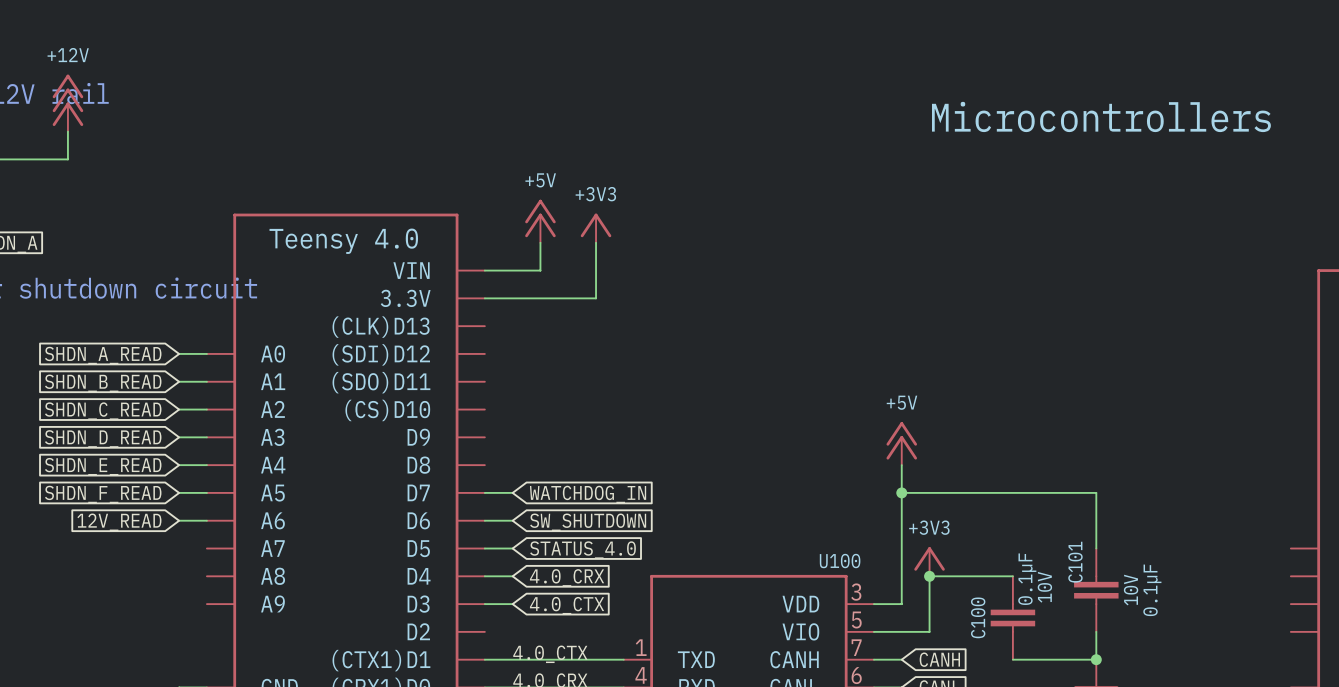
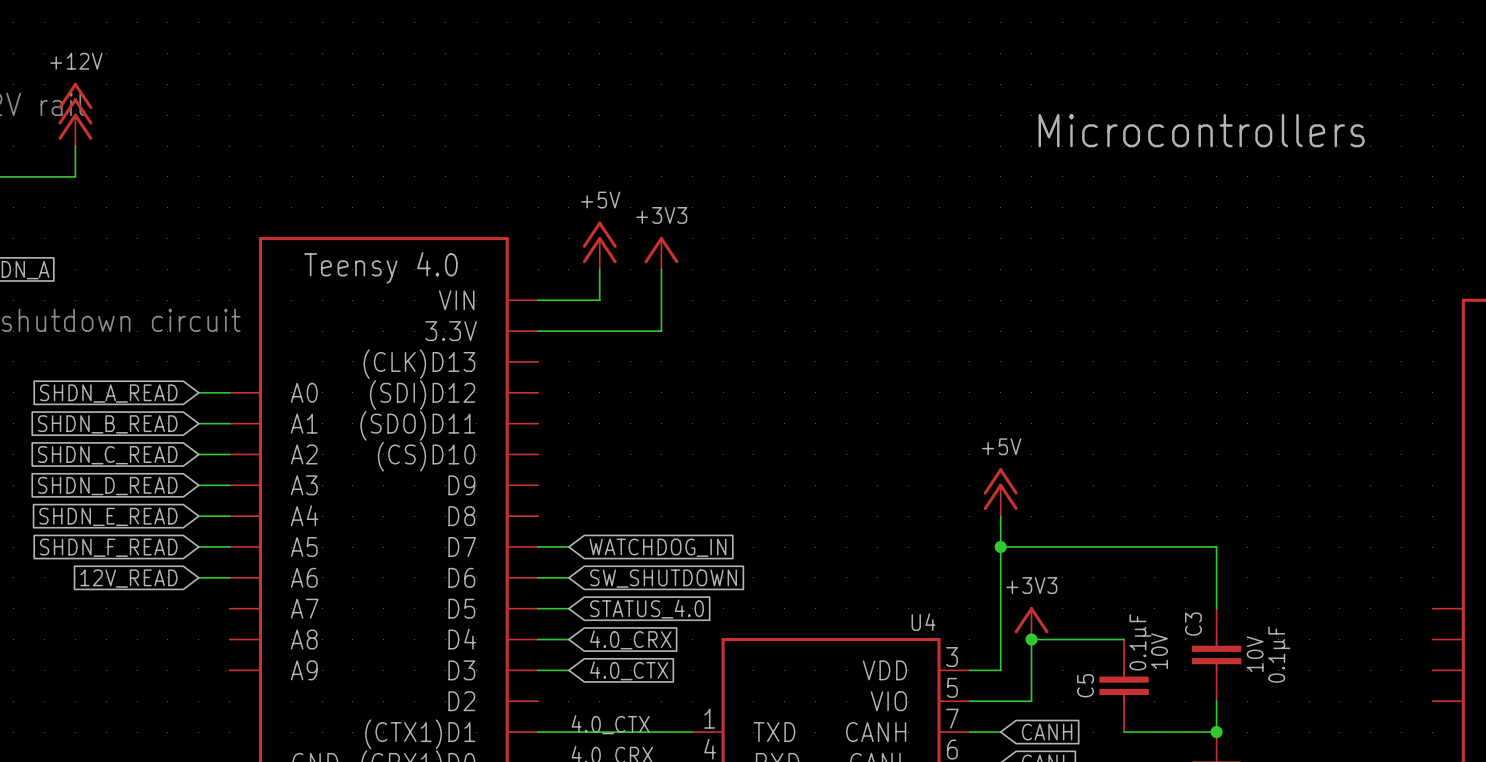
U100 name: U100 (840, 561) -> U4 (923, 622)
C101 name: C101 (1075, 562) -> C3 (1193, 624)
C100 name: C100 (978, 617) -> C5 (1085, 685)

